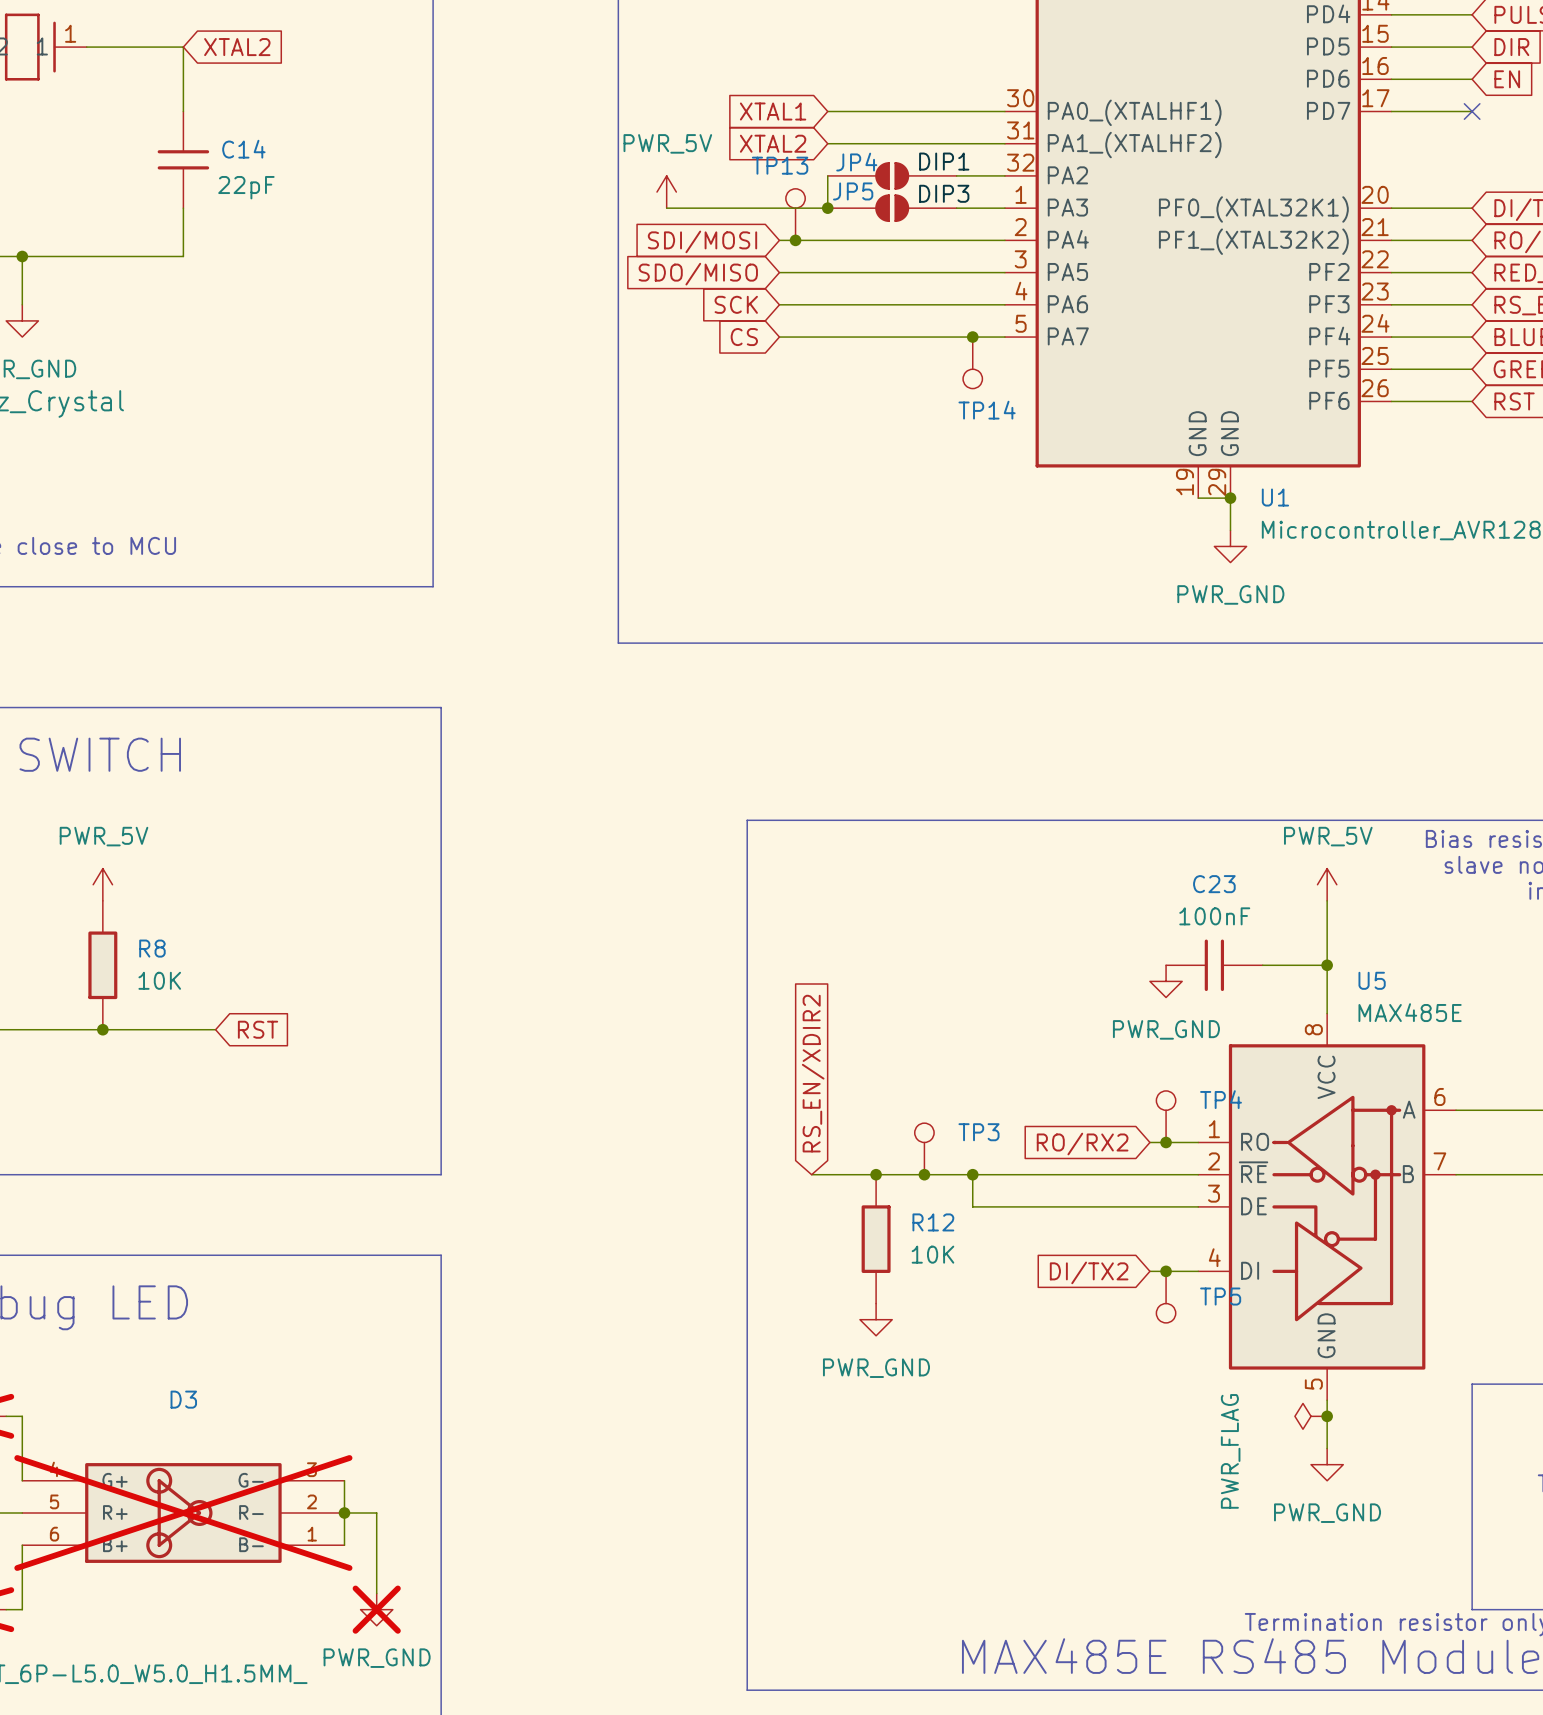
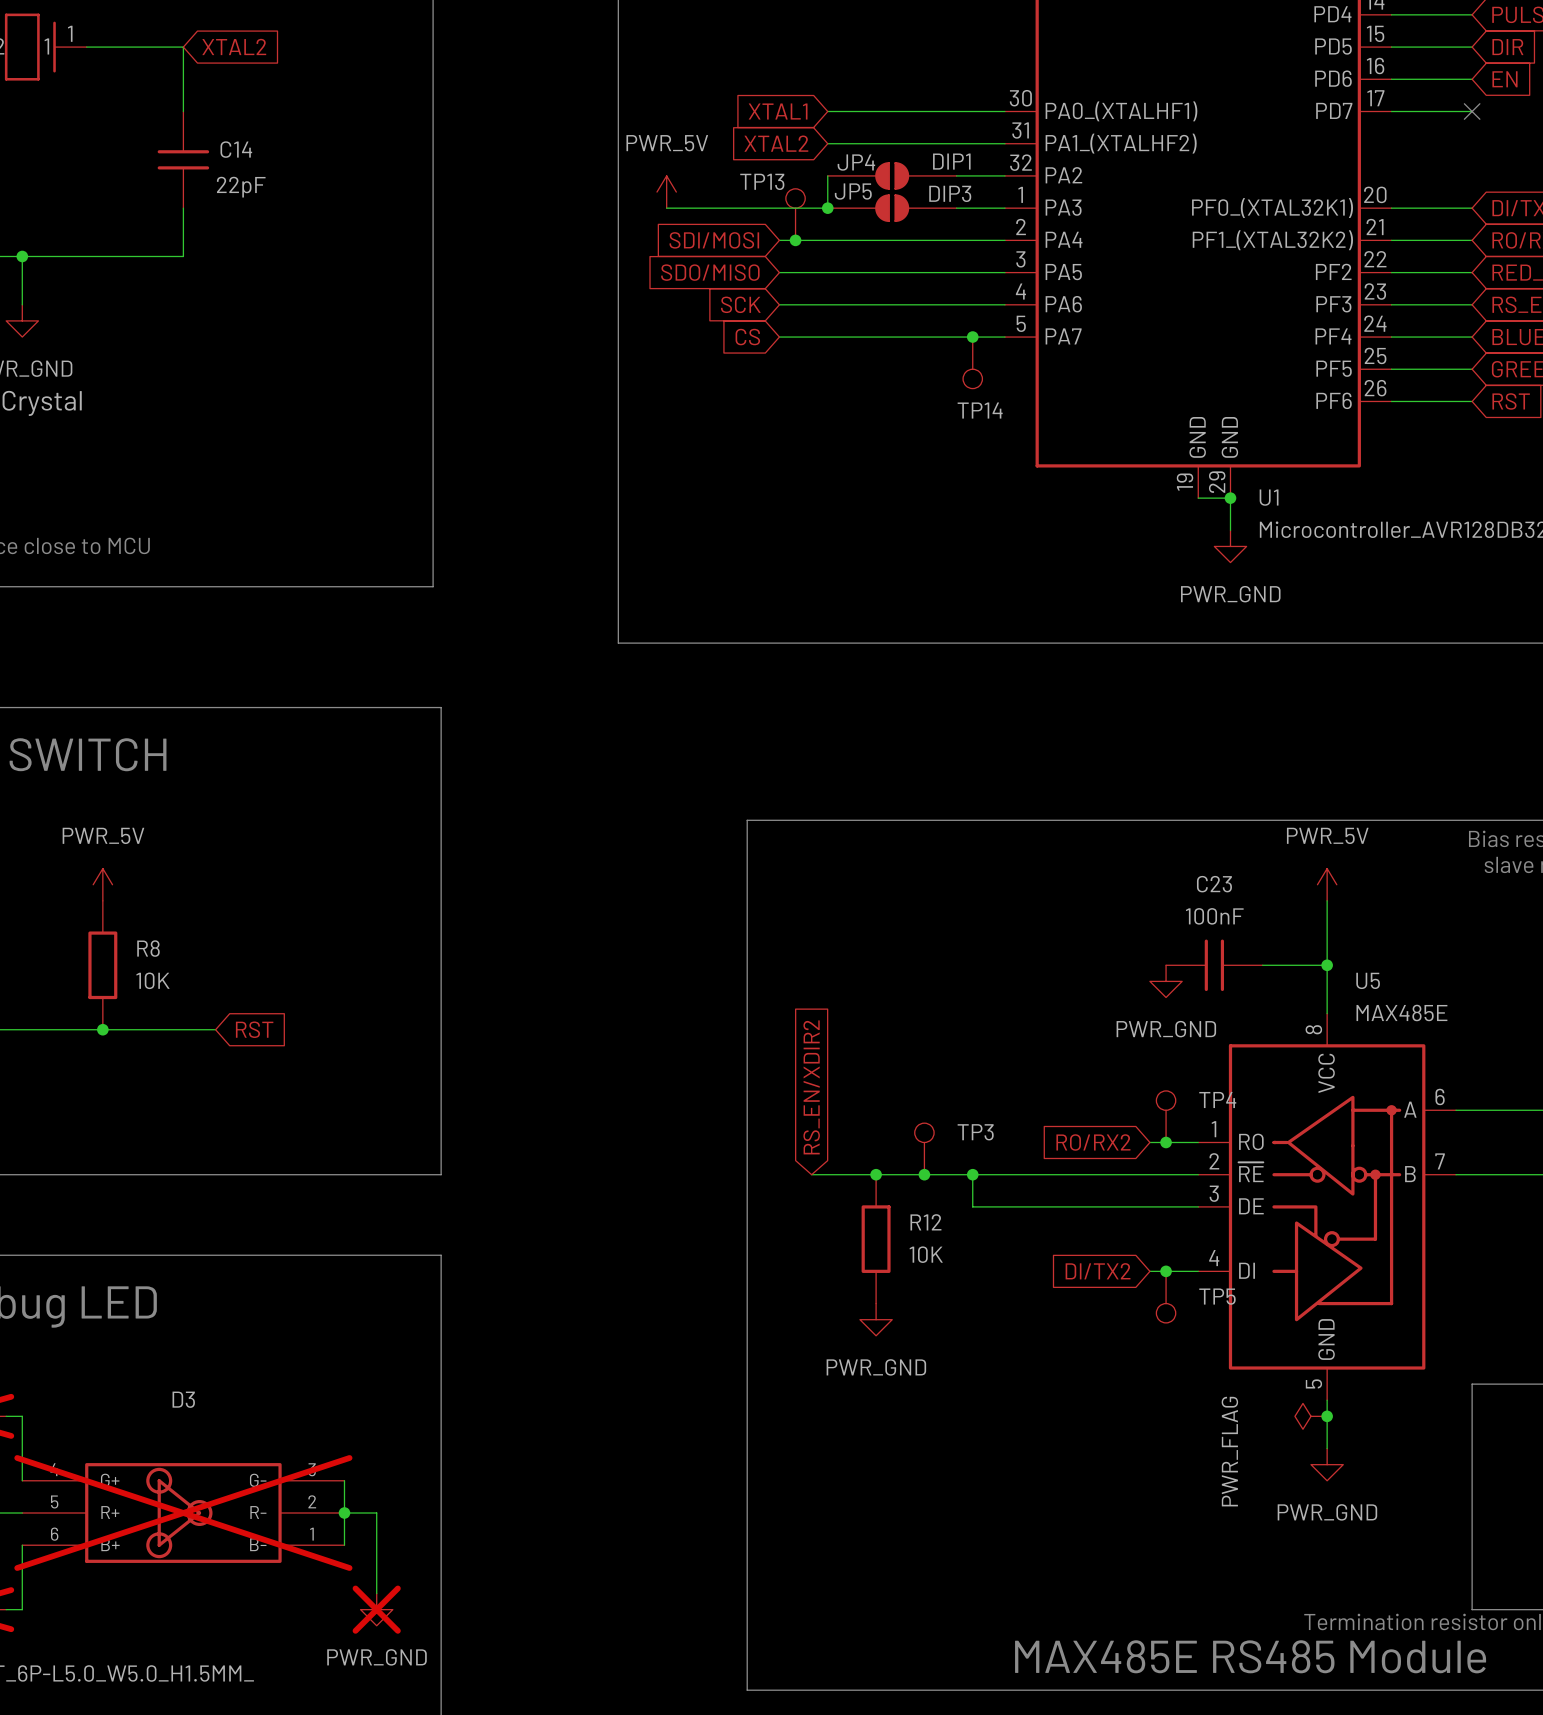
TP13 name position: TP13 (780, 165) -> TP13 (762, 181)

